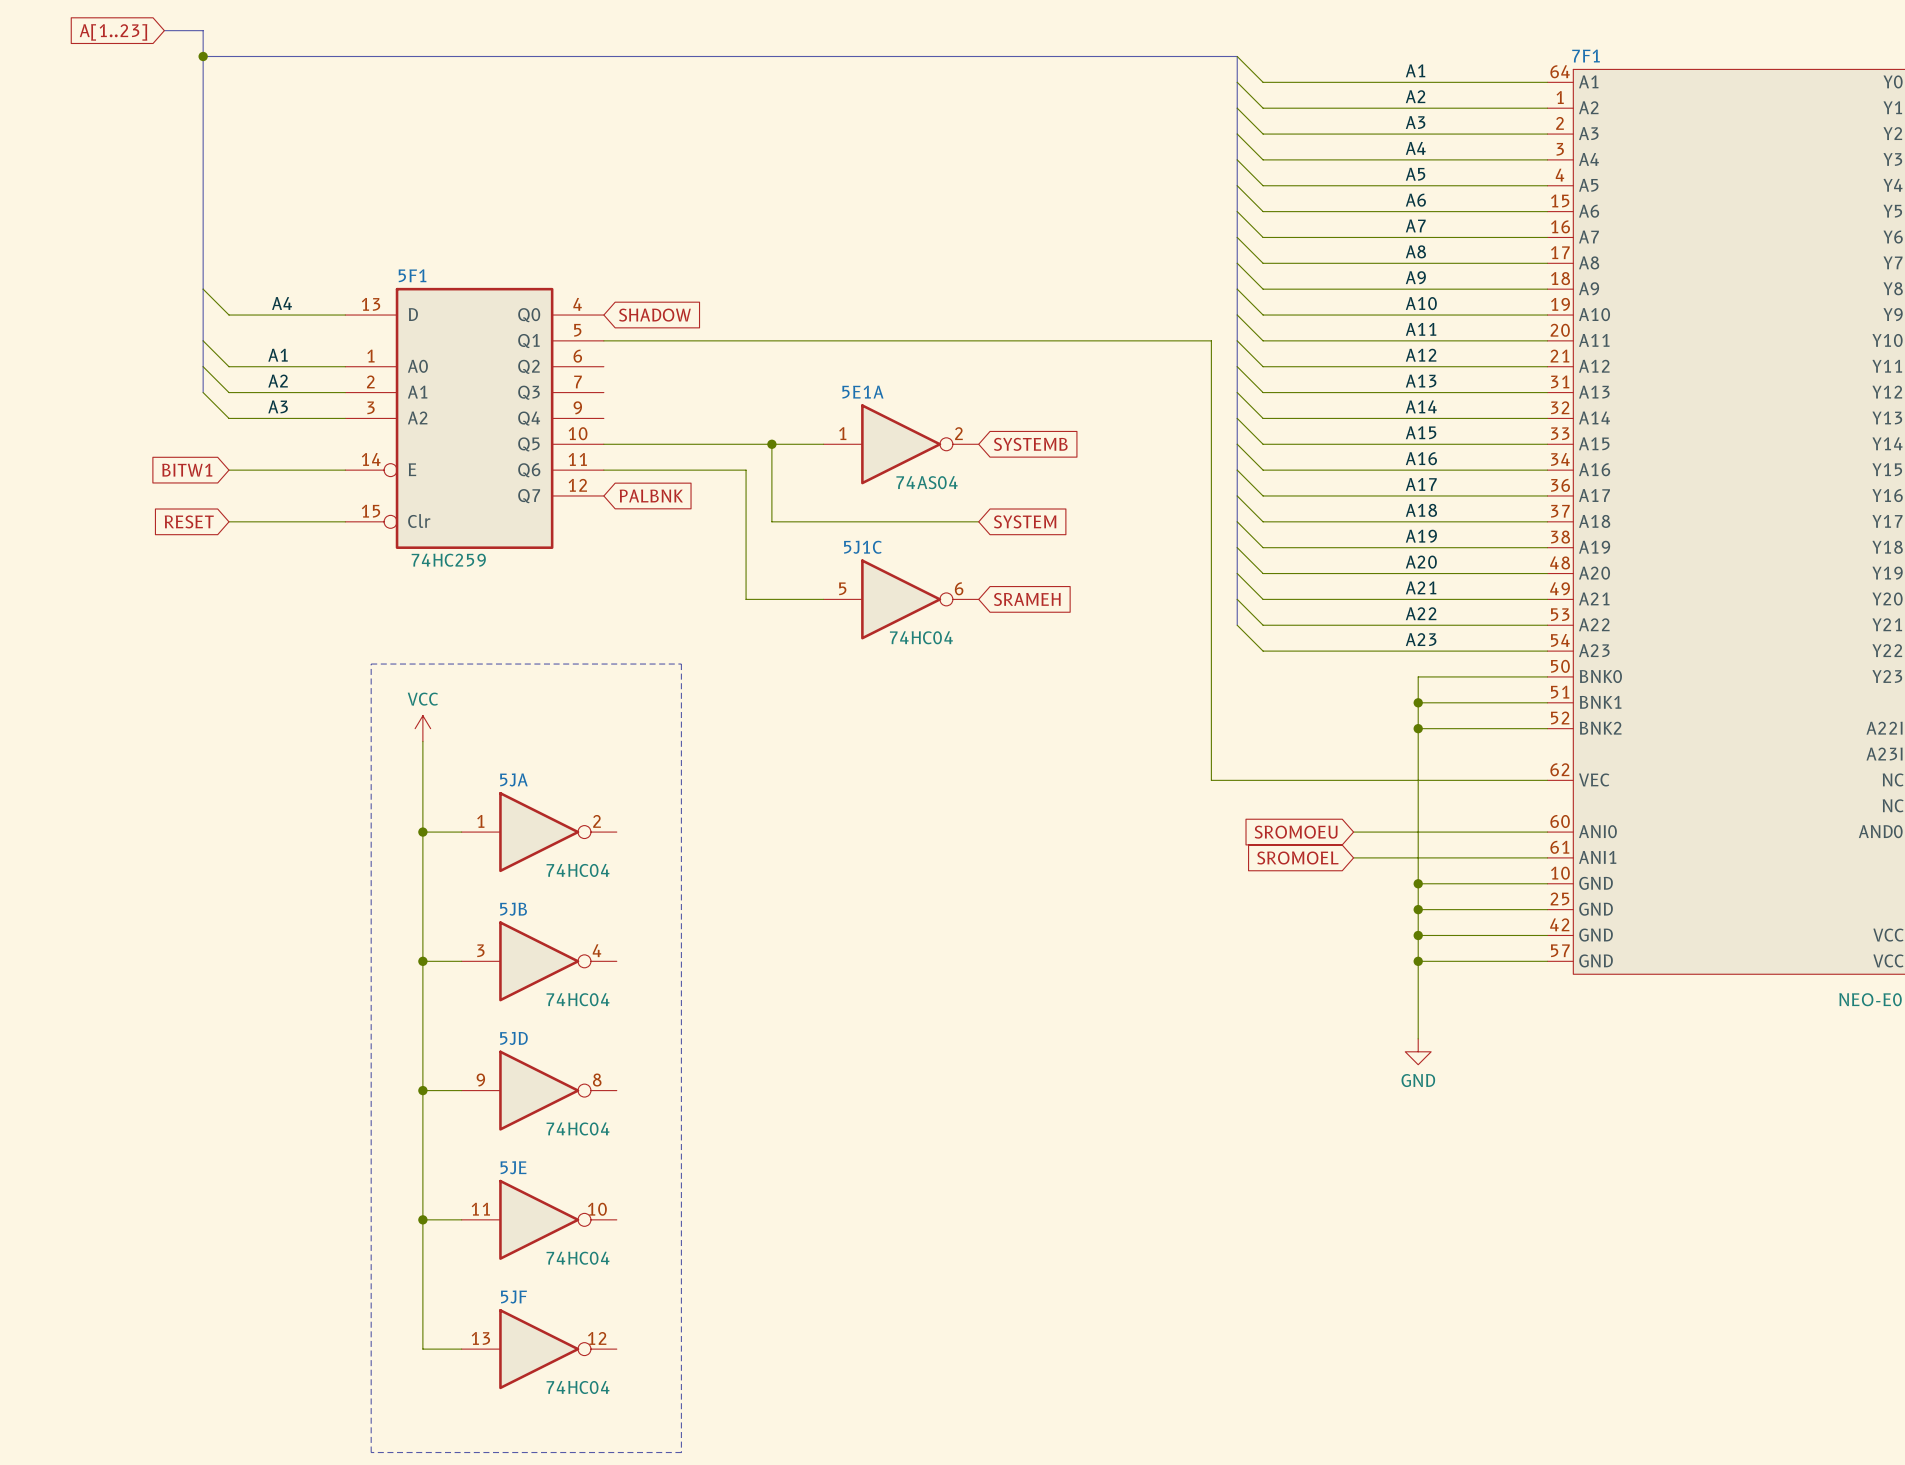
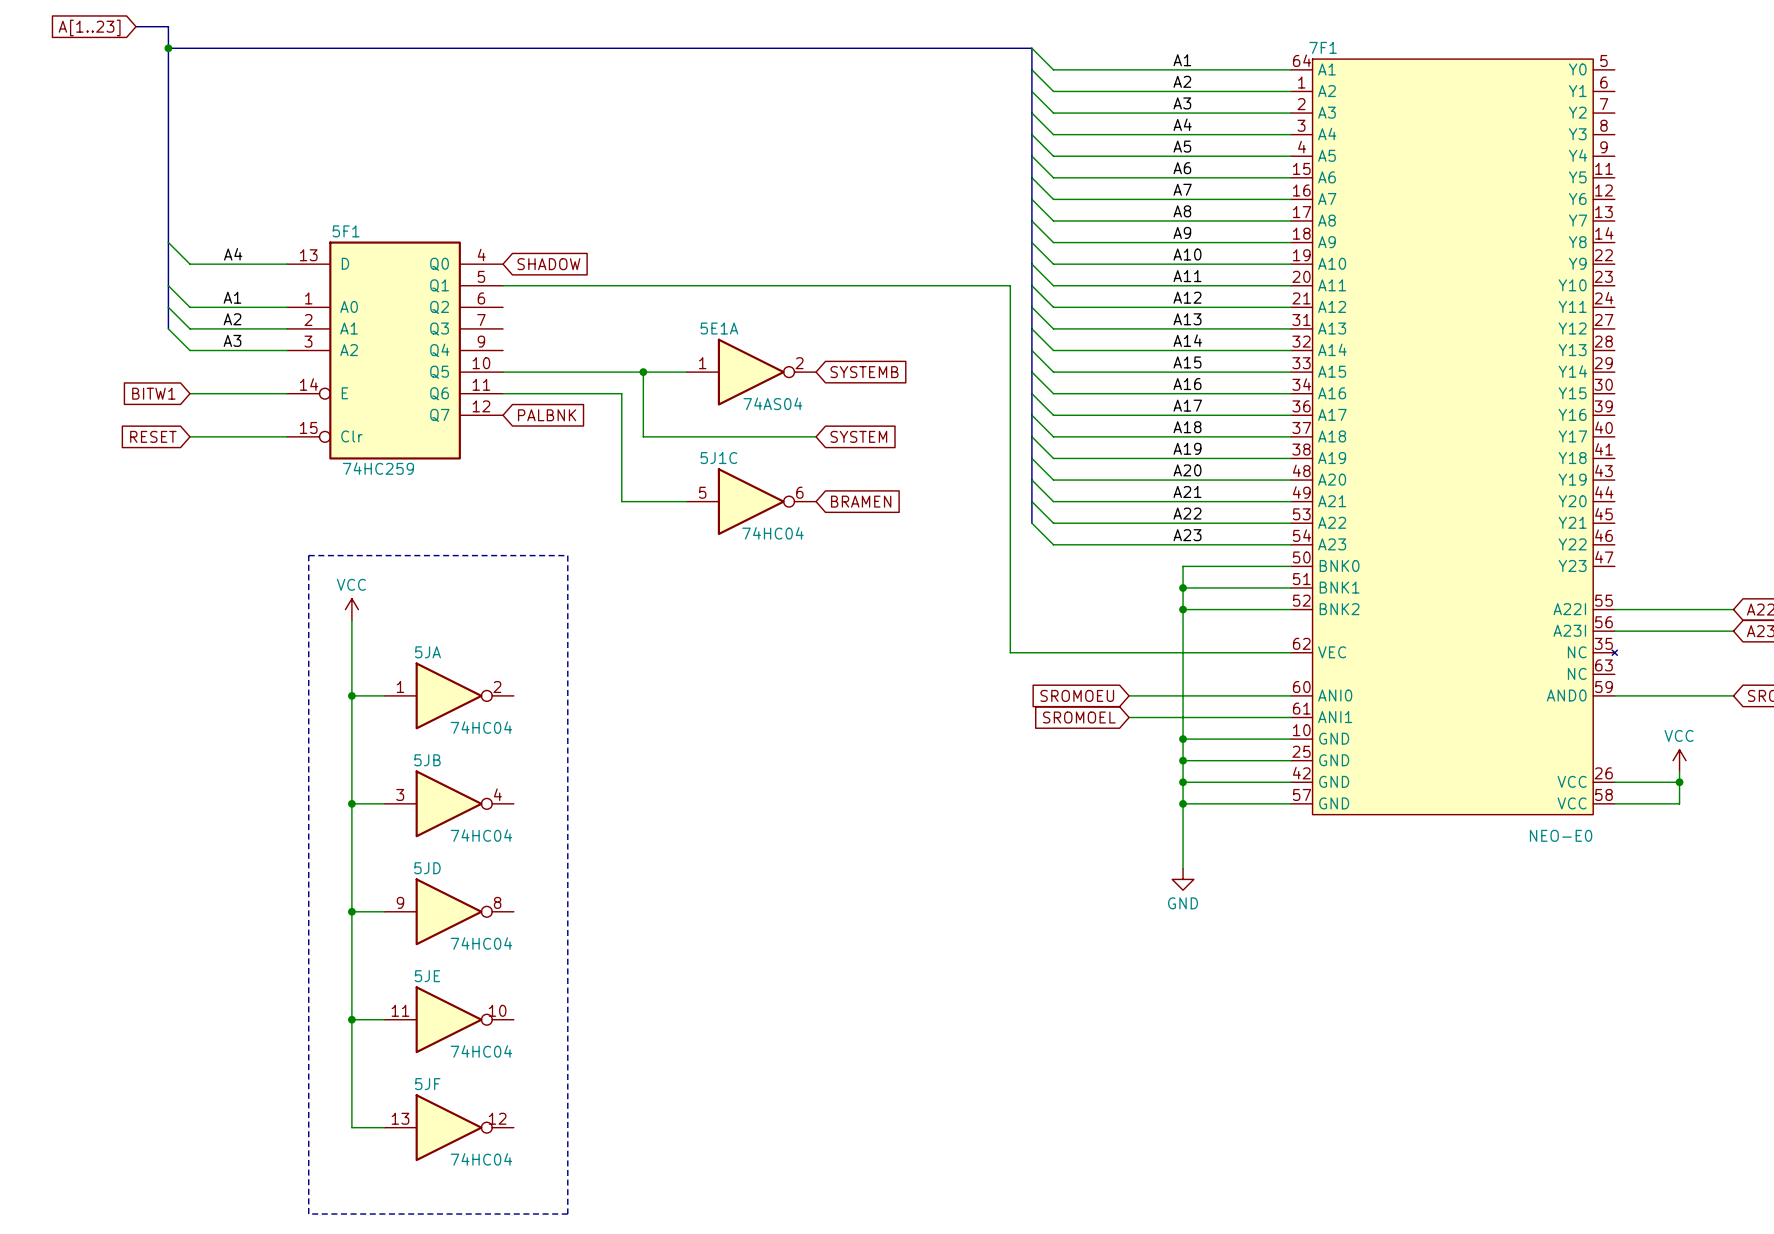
global label: SRAMEH (1027, 599) -> BRAMEN (861, 501)

